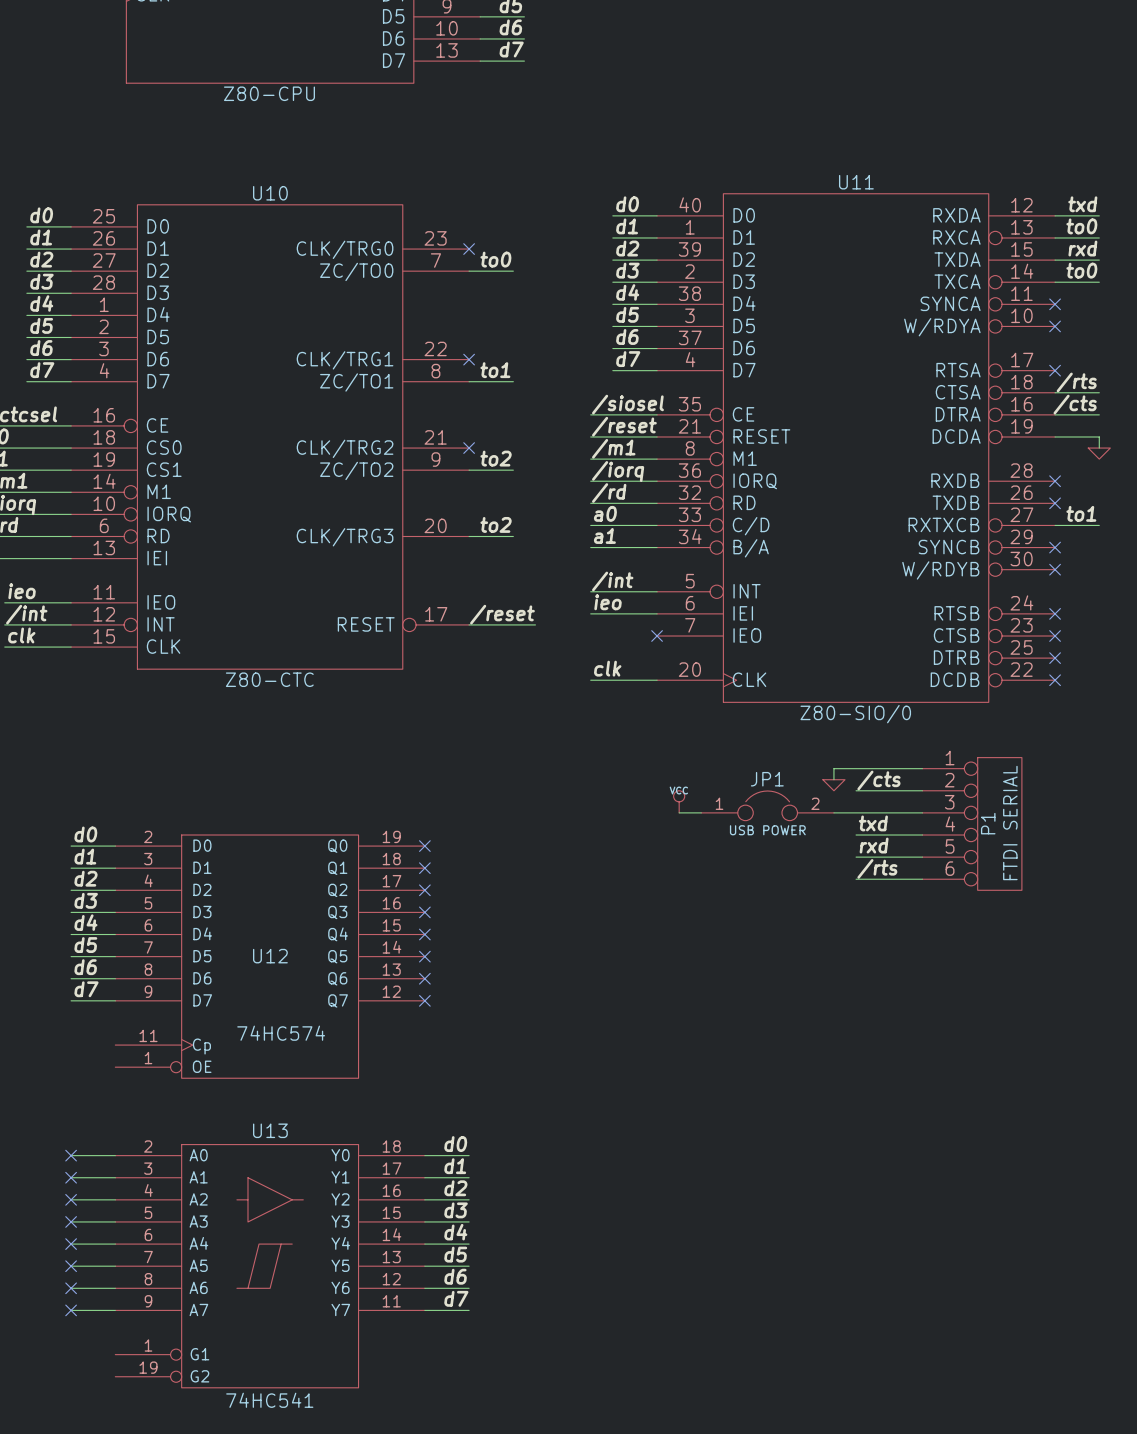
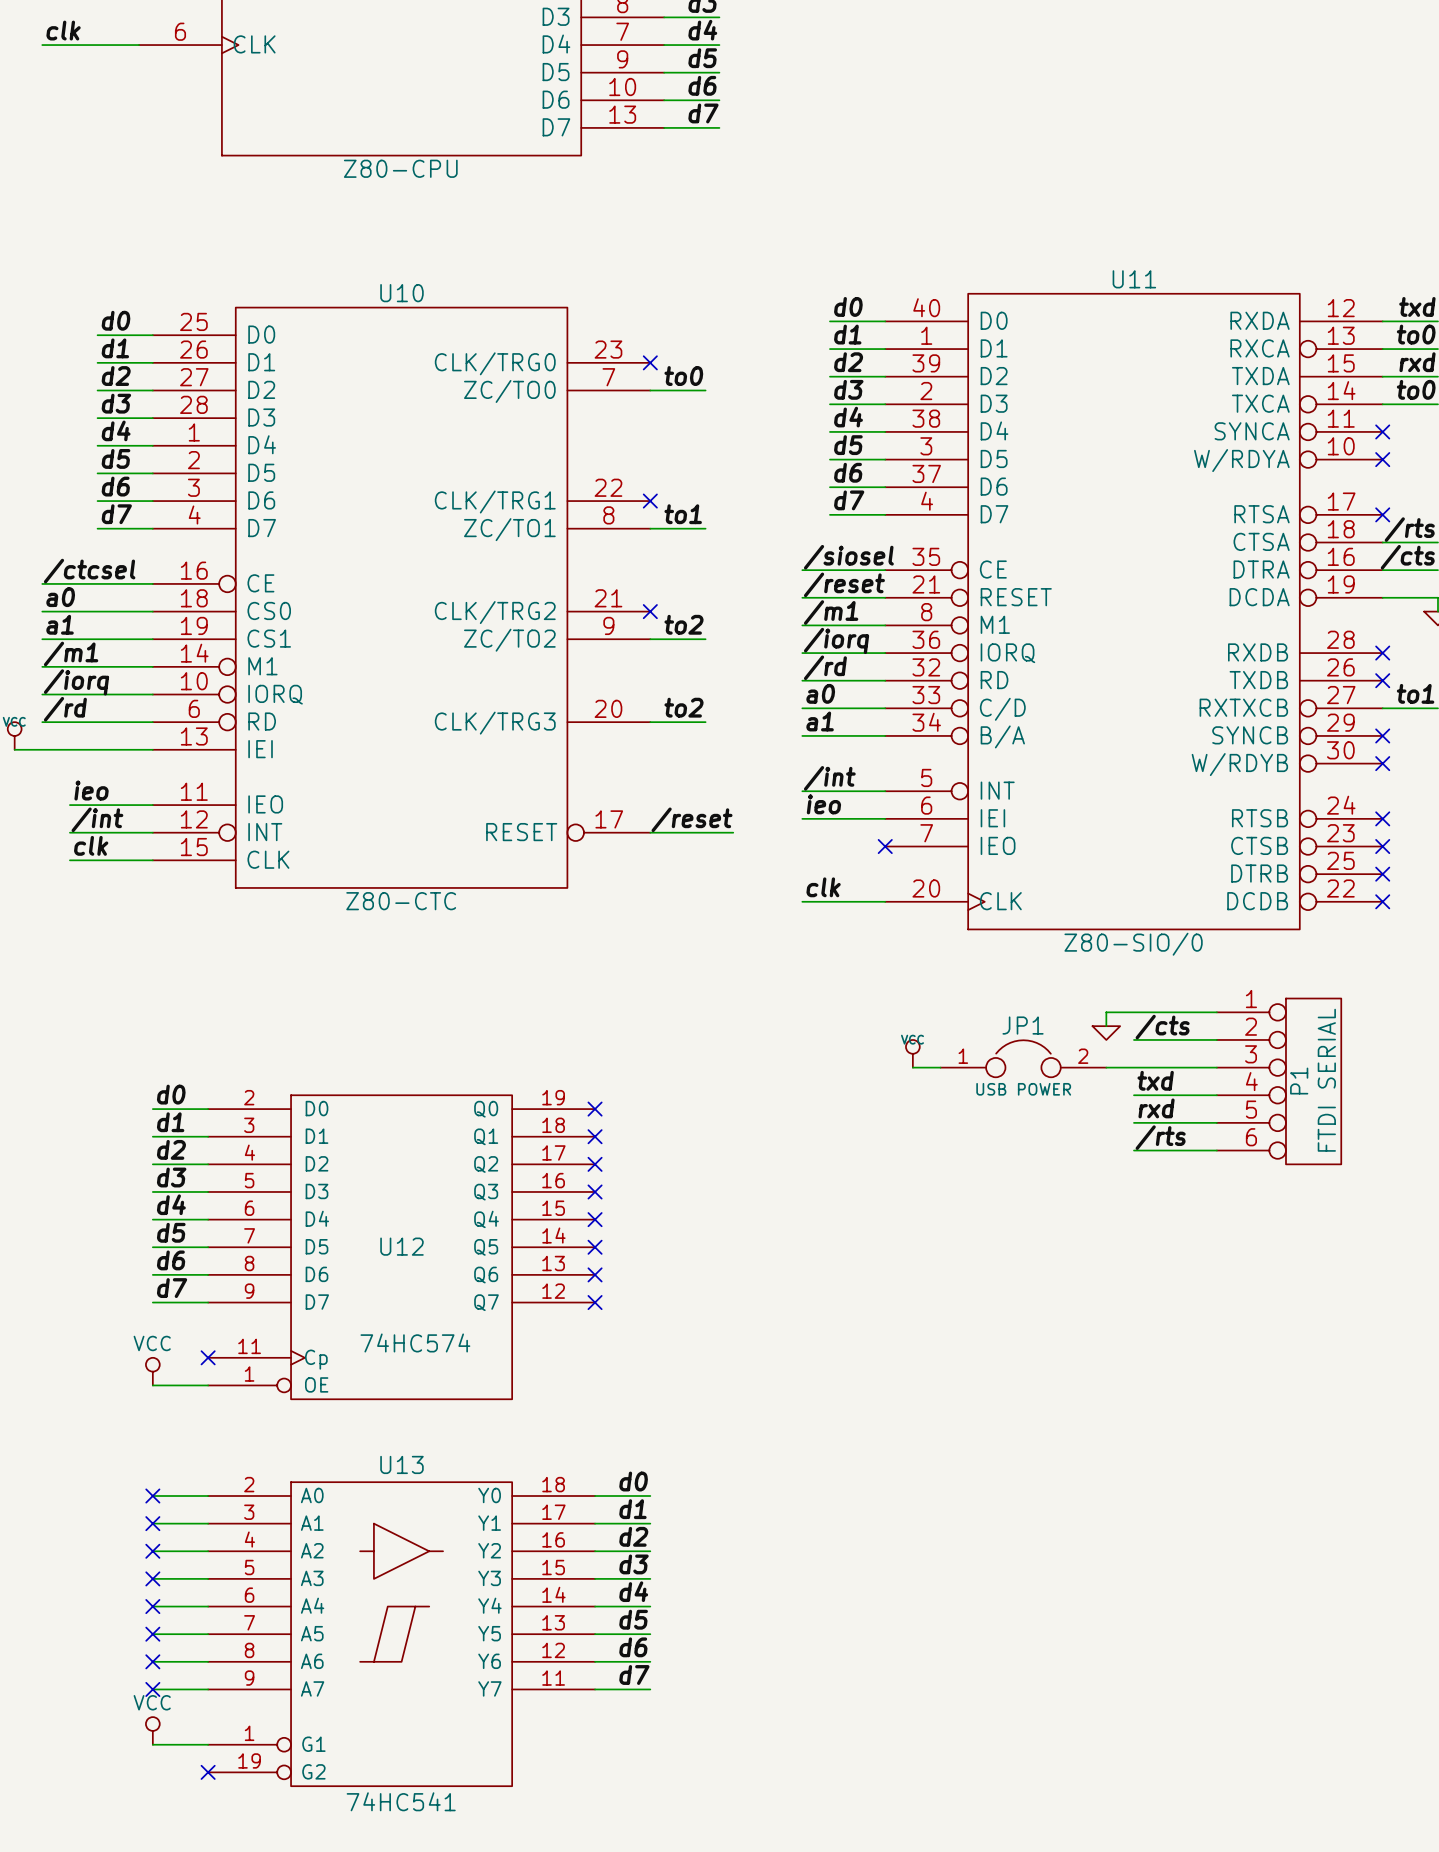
no-connect mark: none -> (208, 1357)
power symbol: none -> VCC (152, 1371)
wire: none -> (152, 1385) (208, 1385)
power symbol: none -> VCC (152, 1730)
wire: none -> (152, 1744) (208, 1744)
no-connect mark: none -> (208, 1772)

